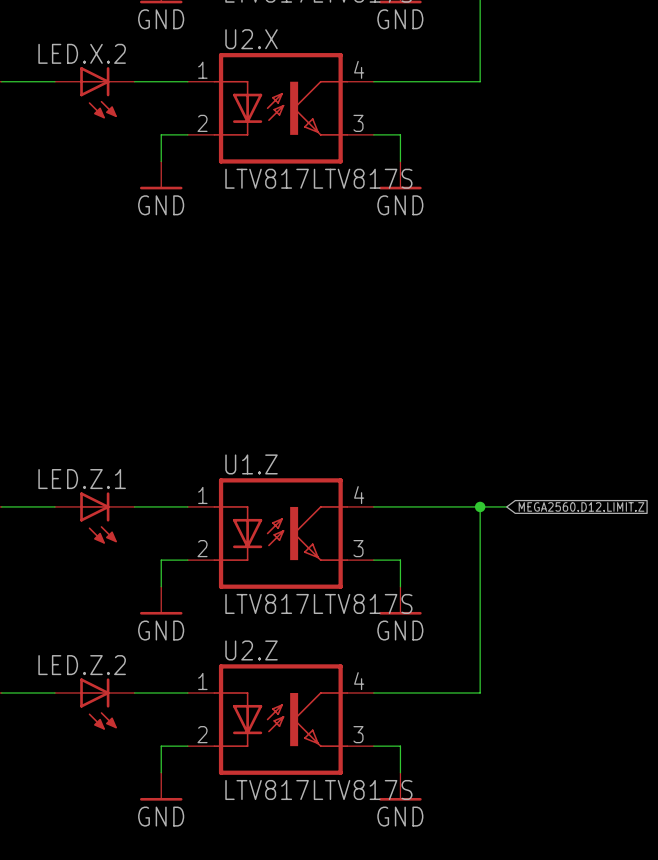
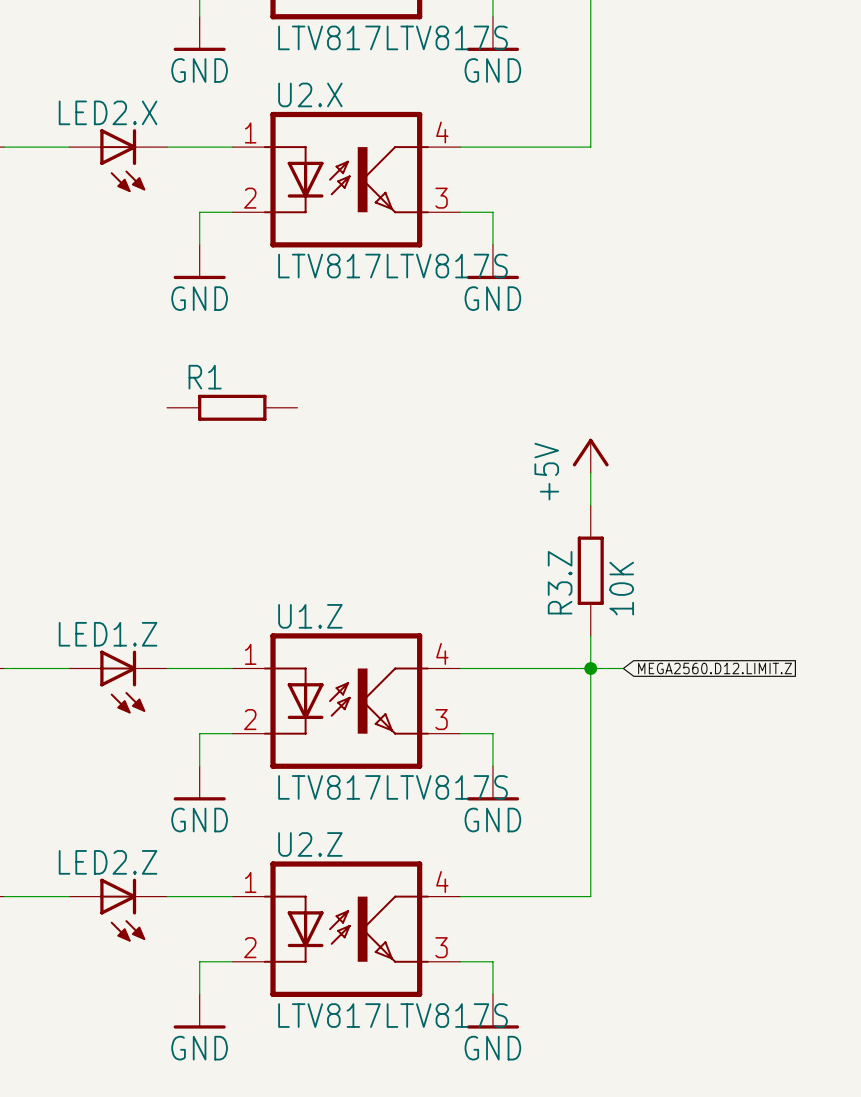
LED.X.2 name: LED.X.2 (82, 53) -> LED2.X (108, 112)
R1: none -> (232, 407)
power symbol: none -> +5V (590, 455)
wire: none -> (590, 472) (590, 505)
R3.Z: none -> 10K (590, 570)
LED.Z.1 name: LED.Z.1 (82, 479) -> LED1.Z (108, 634)
wire: none -> (590, 635) (590, 668)
LED.Z.2 name: LED.Z.2 (82, 665) -> LED2.Z (108, 862)

